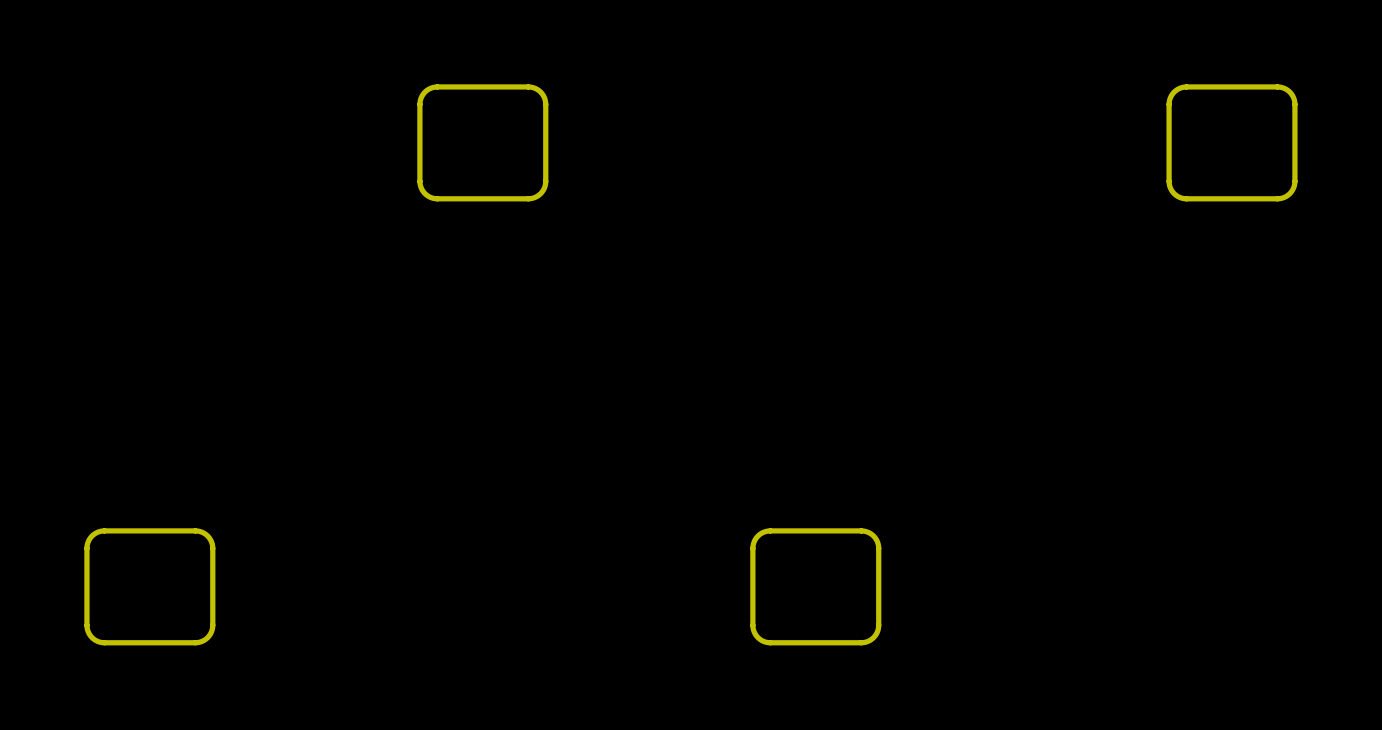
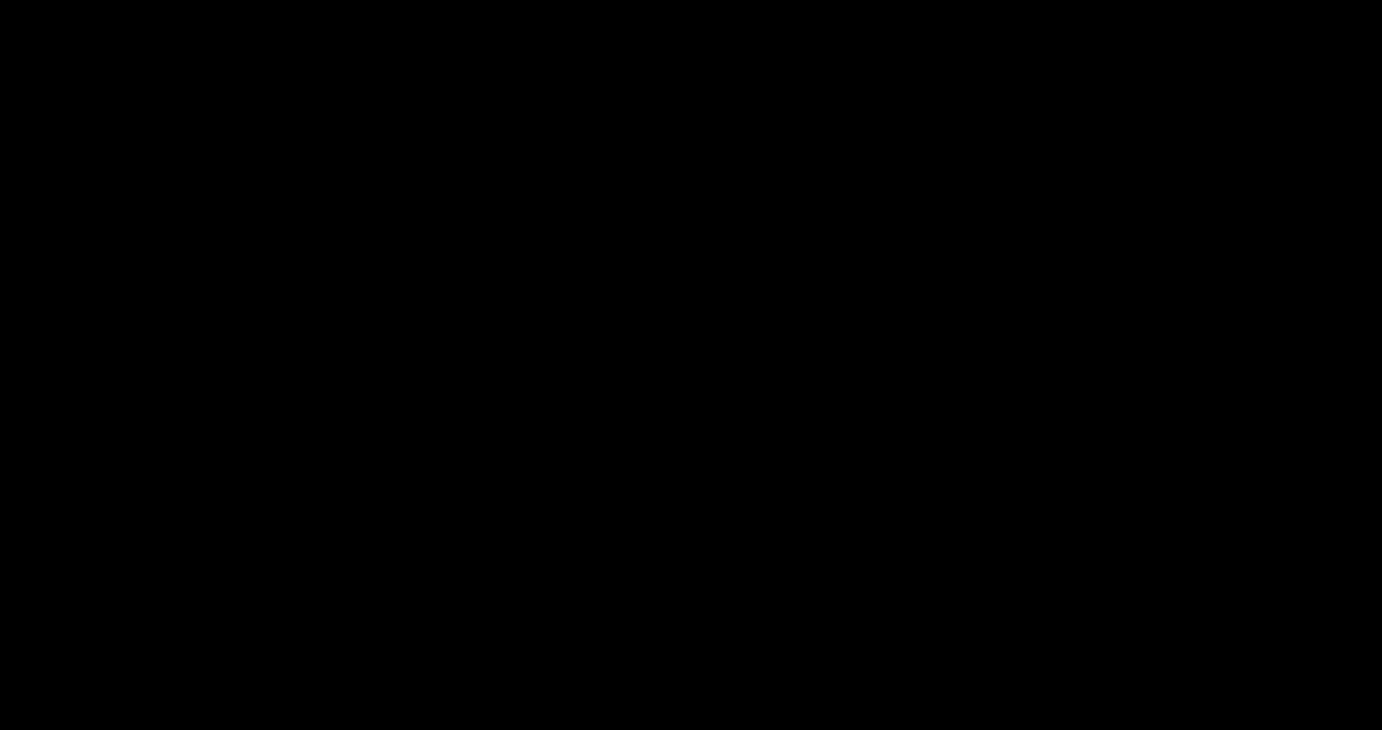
part: (482, 142) -> none
part: (1232, 142) -> none
part: (149, 586) -> none
part: (815, 586) -> none

